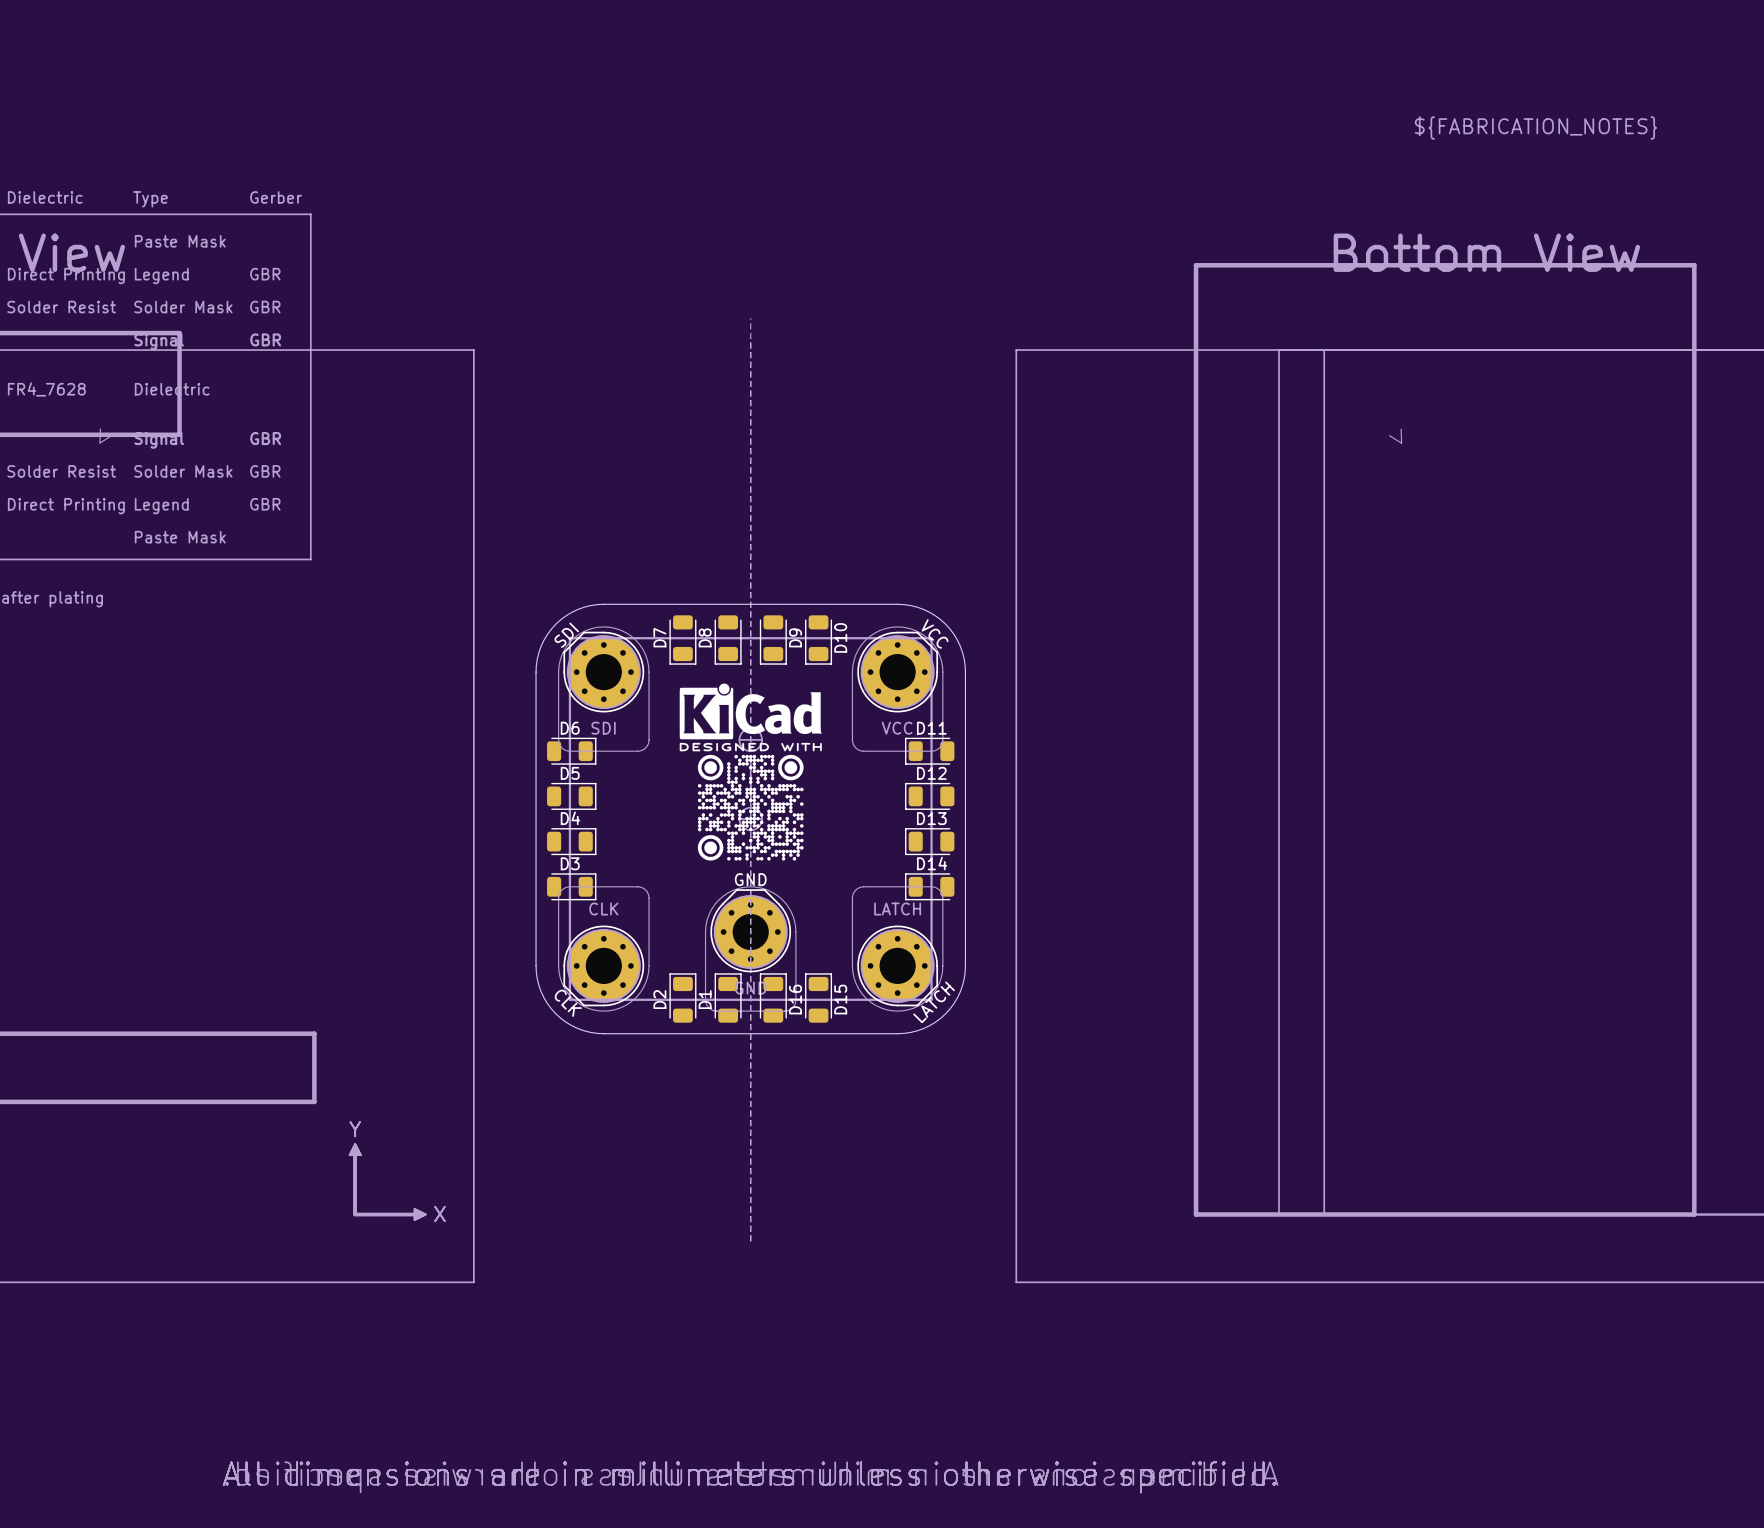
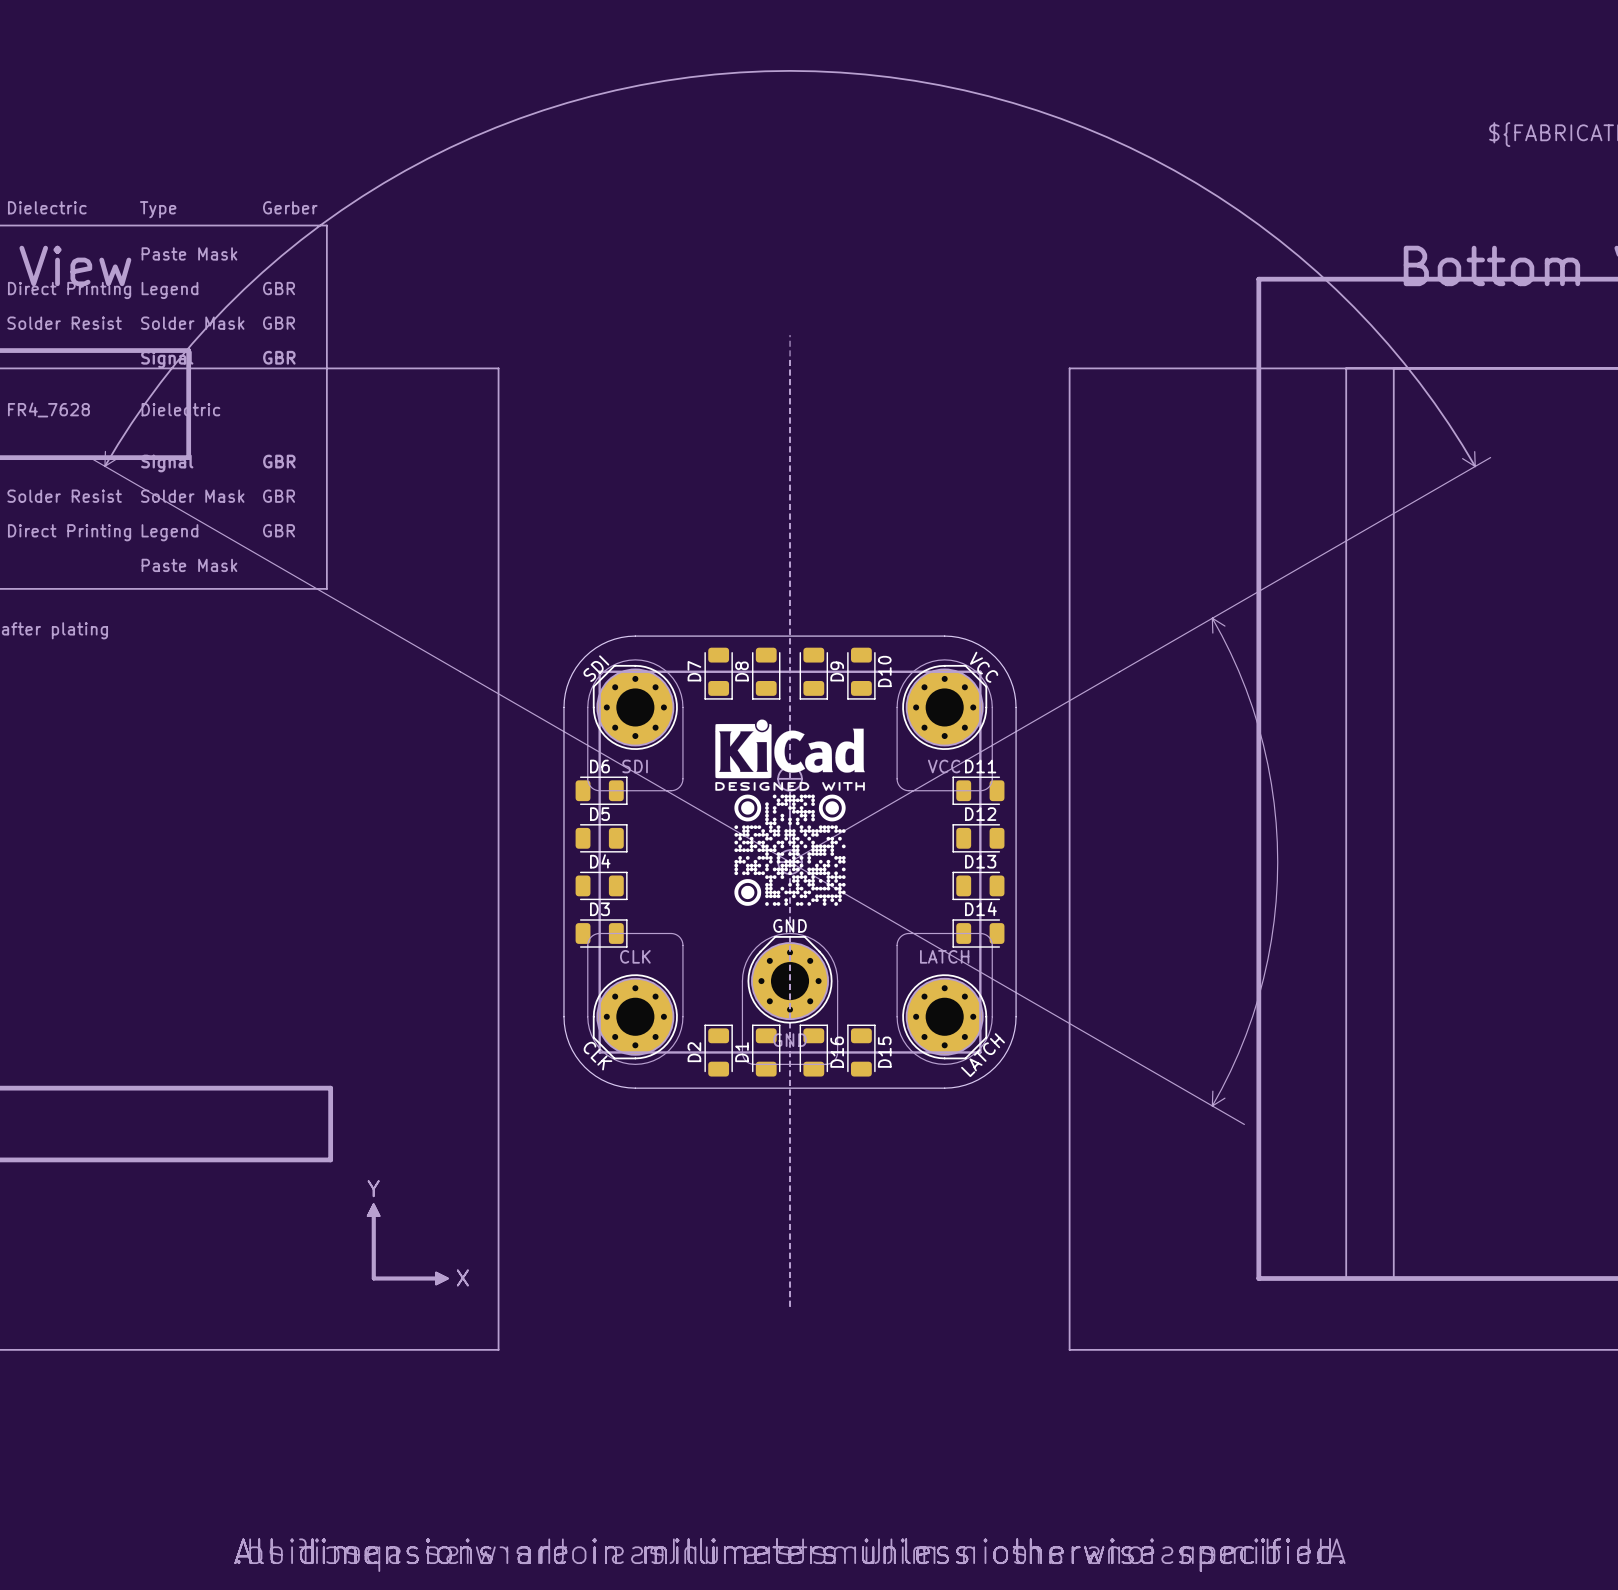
line: none -> (89, 457) (1244, 1124)
line: none -> (1490, 457) (790, 862)
line: none -> (104, 466) (131, 423) (160, 382) (192, 343) (226, 306) (262, 272) (301, 240) (341, 210) (383, 183) (427, 158) (496, 127) (543, 110) (591, 96) (640, 85) (689, 77) (739, 72) (790, 70) (840, 72) (890, 77) (964, 90) (1012, 102) (1060, 118) (1107, 137) (1152, 158) (1196, 183) (1238, 210) (1279, 240) (1317, 272) (1353, 307) (1387, 343) (1419, 382) (1448, 423) (1475, 466)
line: none -> (1212, 618) (1224, 626)
line: none -> (1212, 618) (1212, 633)
line: none -> (1212, 618) (1238, 670) (1252, 707) (1263, 745) (1274, 803) (1277, 862) (1274, 920) (1263, 978) (1246, 1035) (1230, 1071) (1212, 1106)
line: none -> (1212, 1091) (1212, 1106)
line: none -> (1224, 1098) (1212, 1106)

